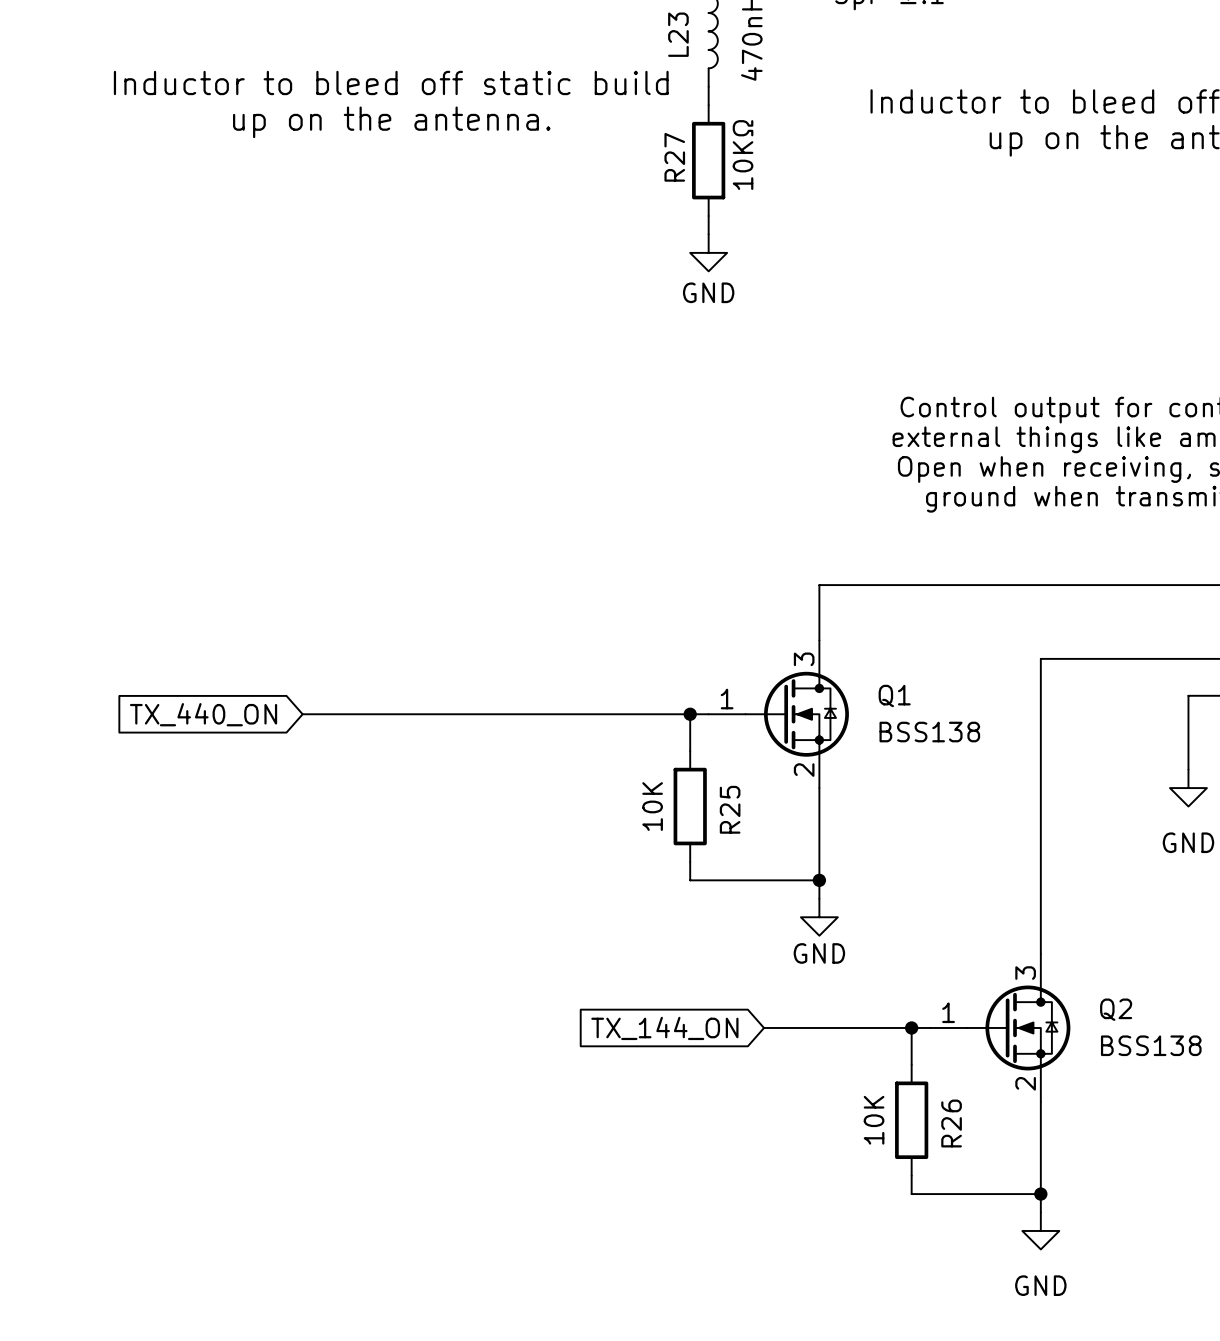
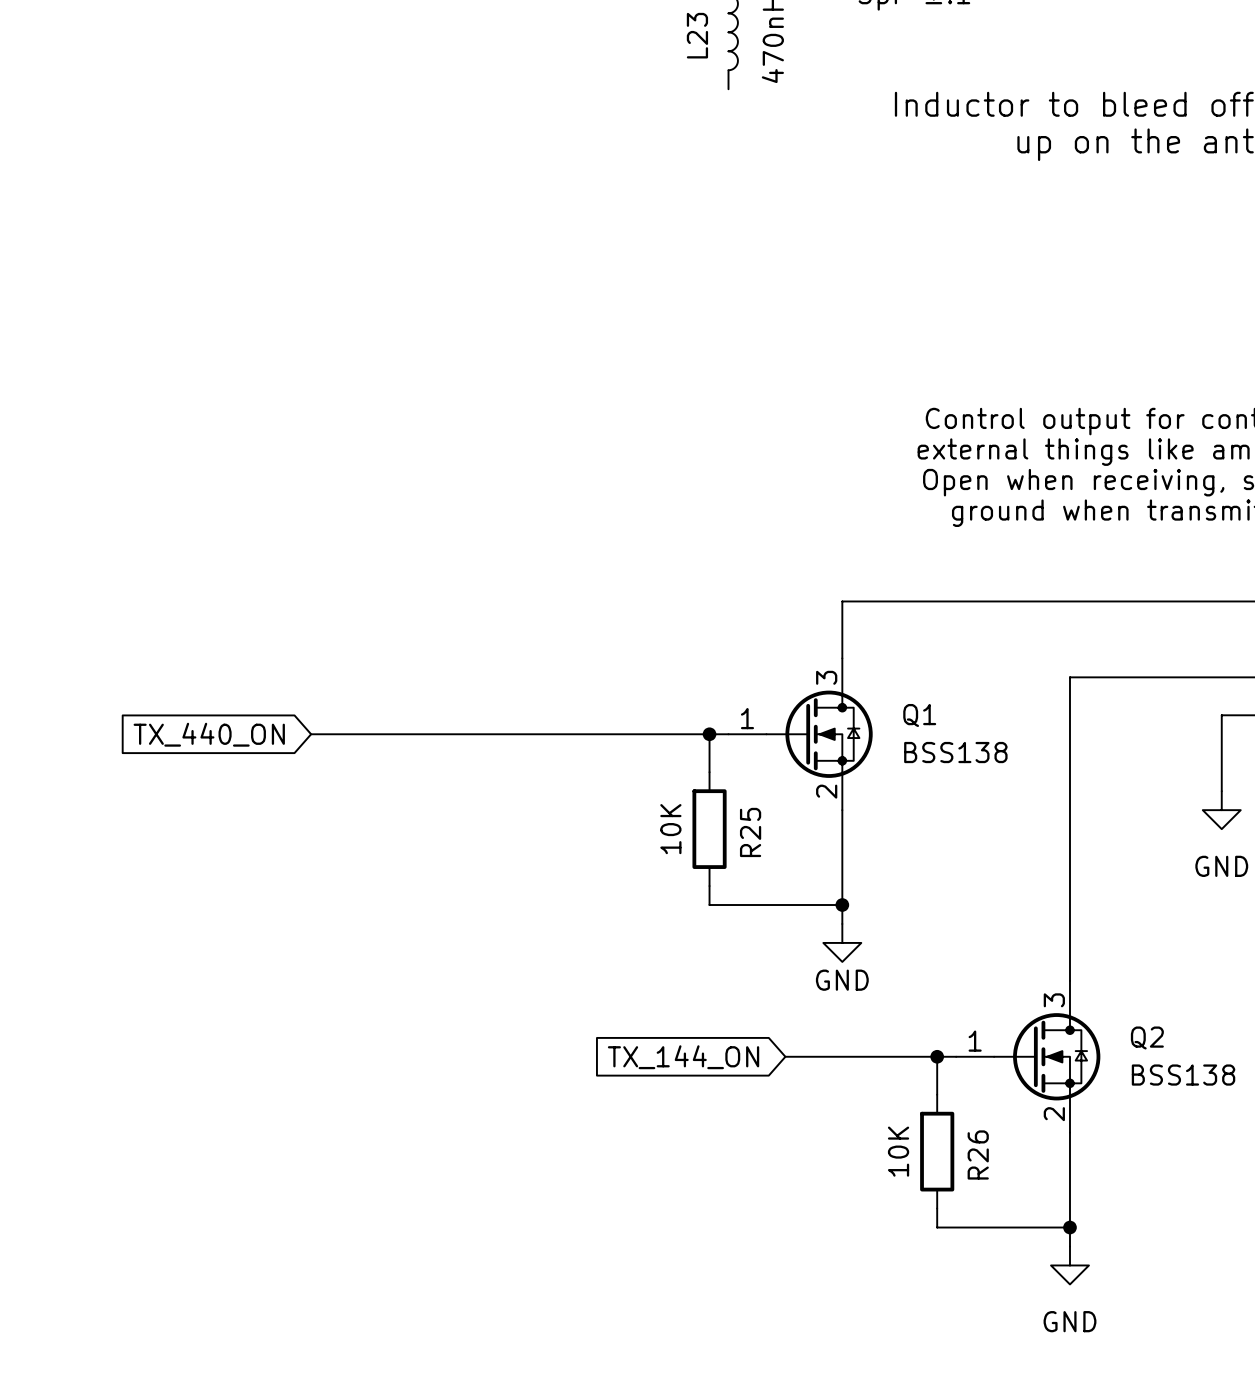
text: Inductor to bleed off static build (391, 82) -> none
wire: (708, 86) (708, 105) -> none
text: up on the antenna. (391, 122) -> none
R27: 10KΩ (708, 160) -> none
wire: (708, 215) (708, 234) -> none
power symbol: GND (708, 252) -> none

